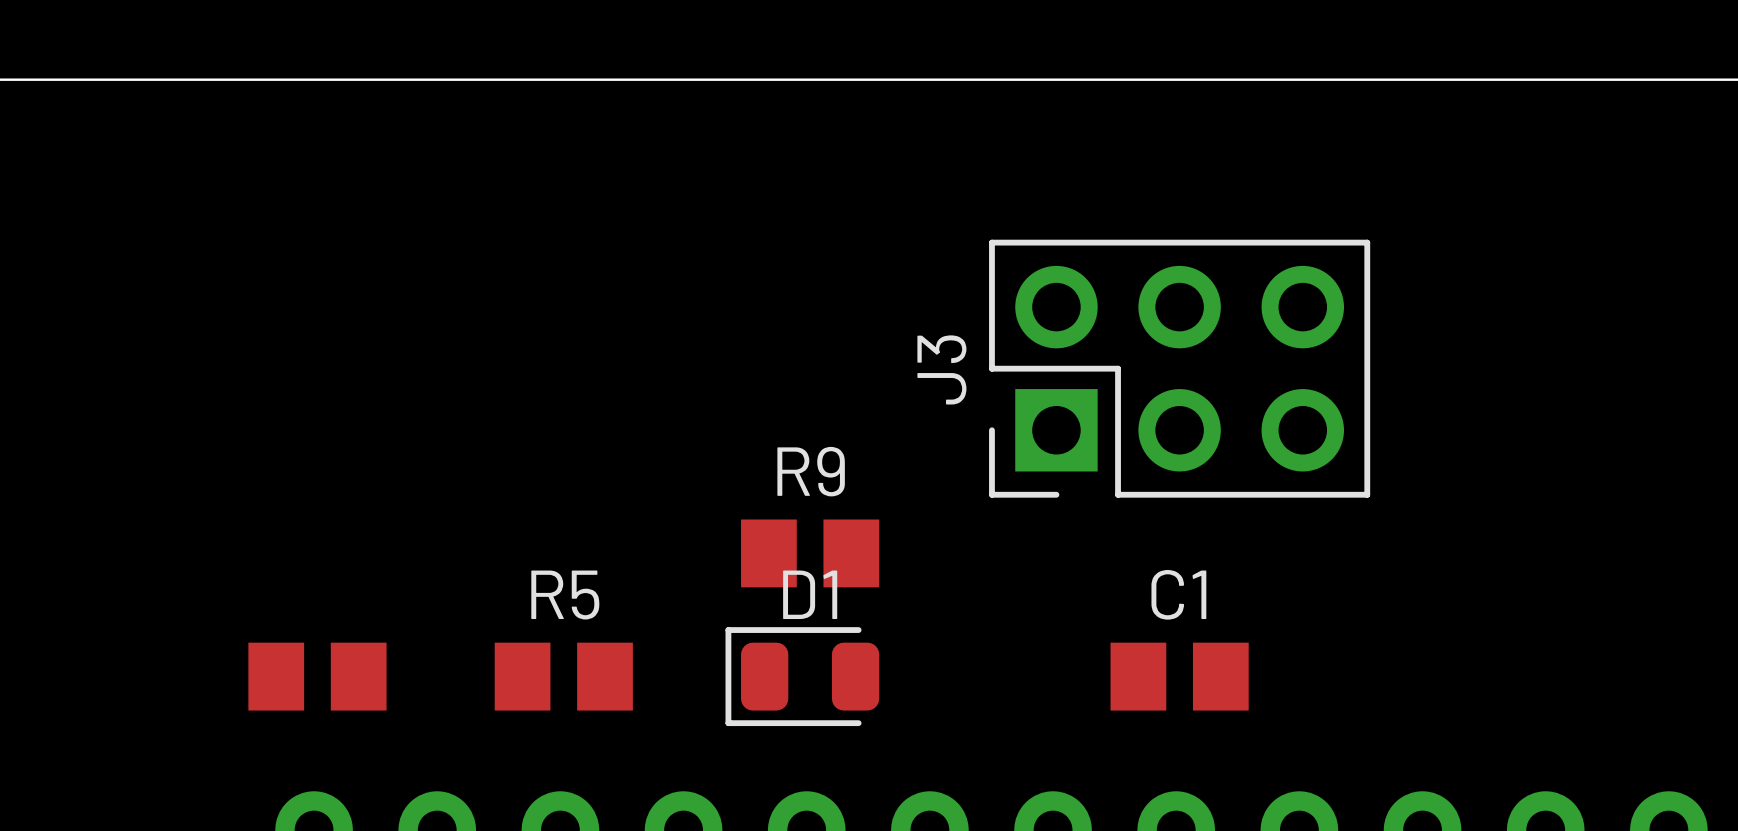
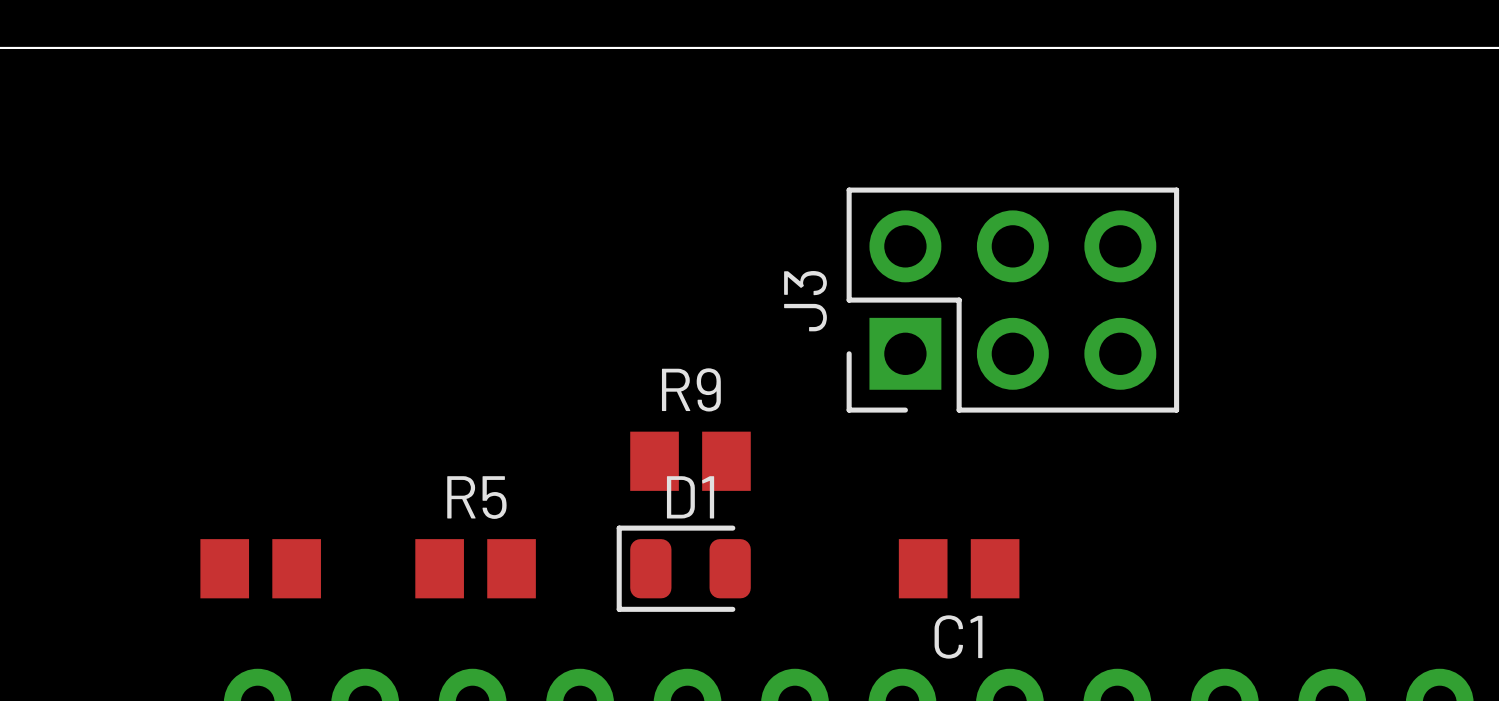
C1 name position: C1 (1178, 594) -> C1 (958, 636)
C1 position: (1179, 676) -> (959, 568)

